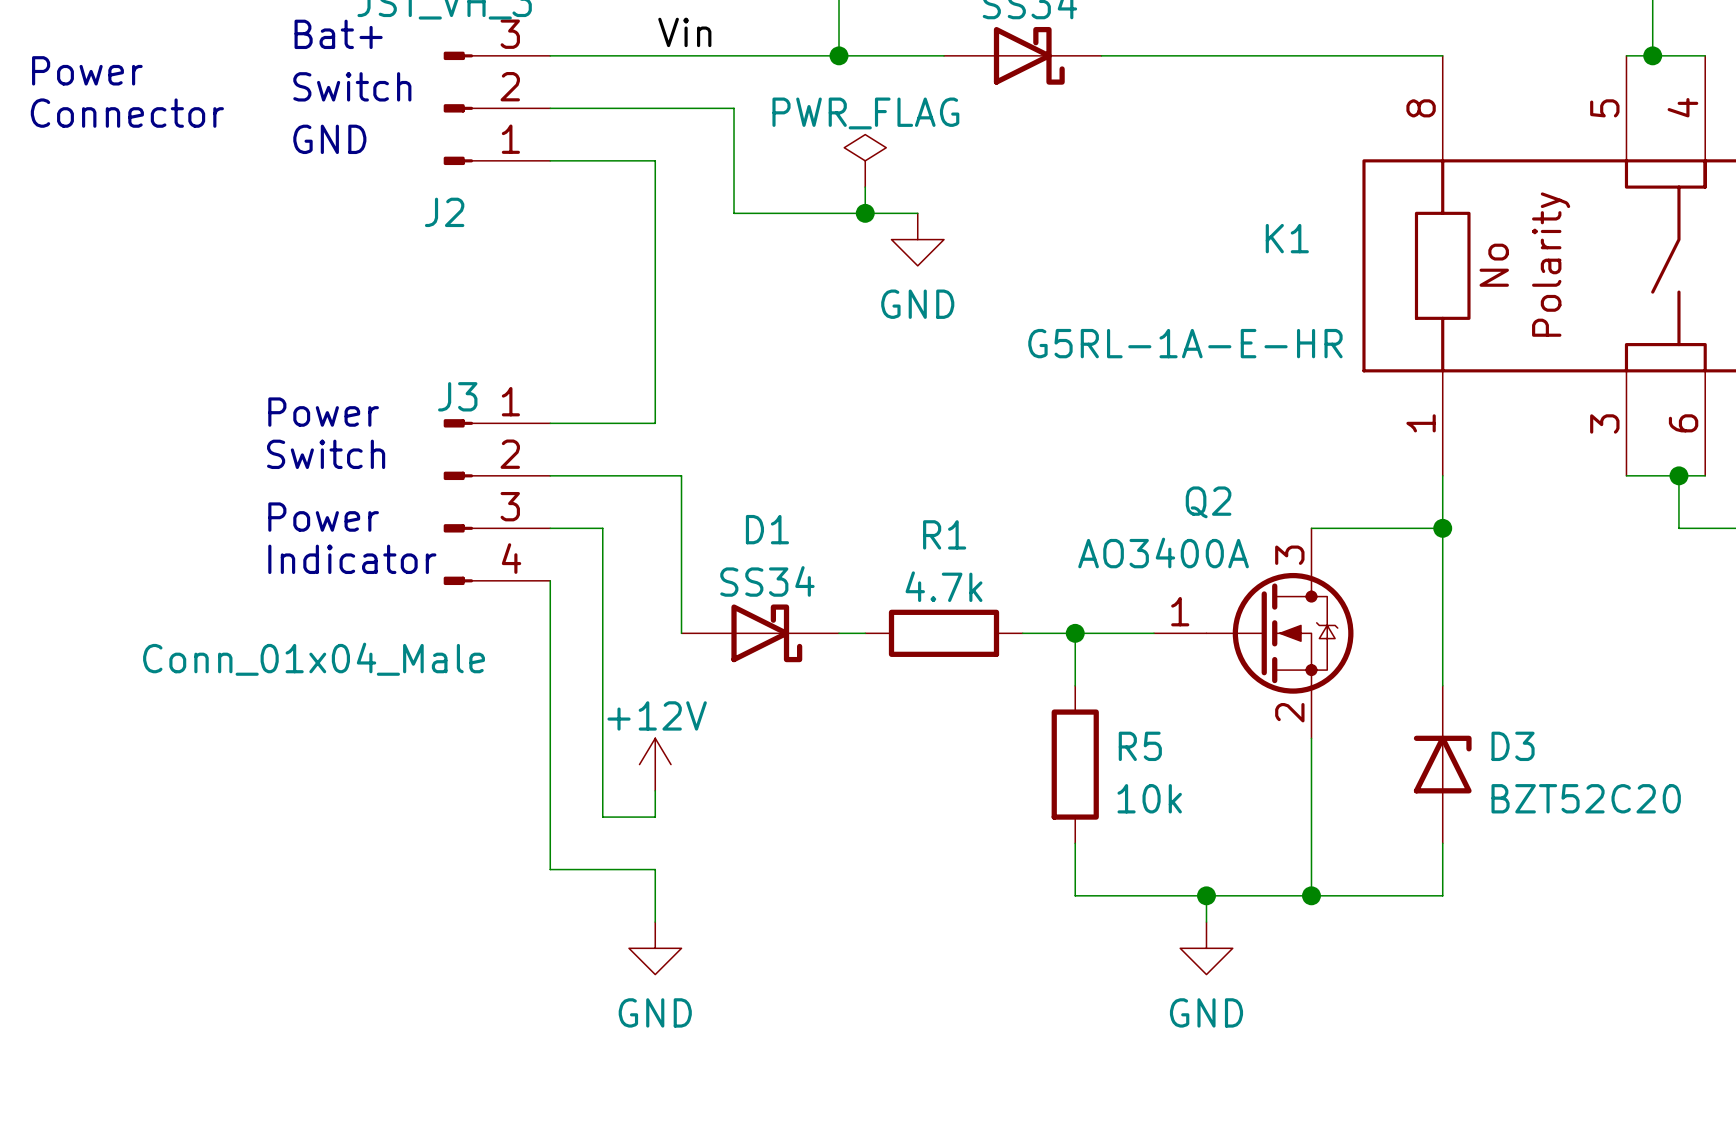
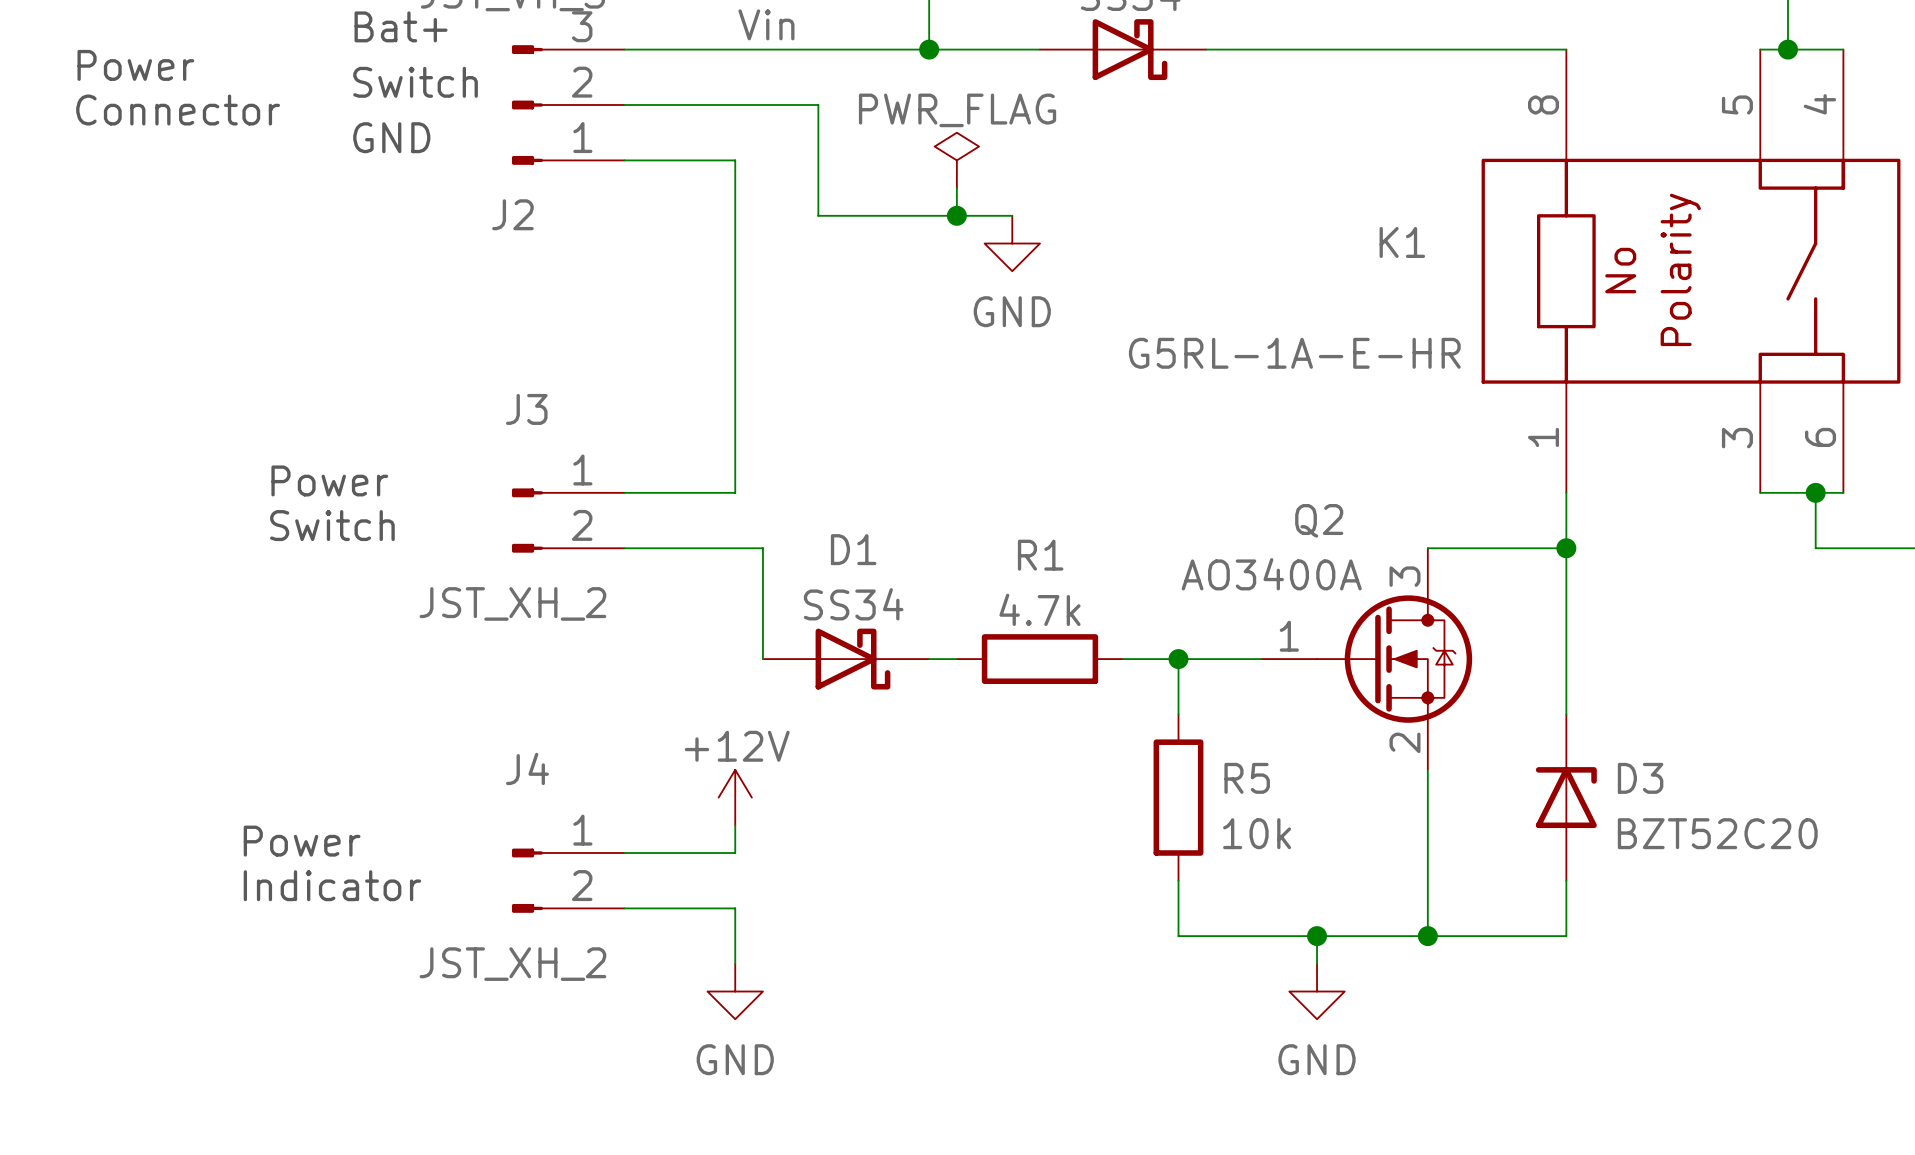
text: Power (323, 412) -> none
J3 symbol: [443, 419, 551, 586] -> [511, 488, 625, 553]
wire: (550, 423) (655, 423) -> (735, 492) (735, 437)
text position: Switch (326, 454) -> Switch (332, 525)
text: none -> Power (329, 480)
wire: (655, 475) (681, 475) (681, 528) -> (679, 548) (762, 548)
text: Power (323, 517) -> none
wire: (602, 528) (602, 817) -> (624, 853) (679, 853)
text position: Indicator (352, 559) -> Indicator (332, 885)
wire: (550, 580) (550, 869) -> none
J3 value: Conn_01x04_Male (314, 659) -> JST_XH_2 (512, 603)
text: none -> Power (302, 841)
J4: none -> JST_XH_2 (568, 880)

